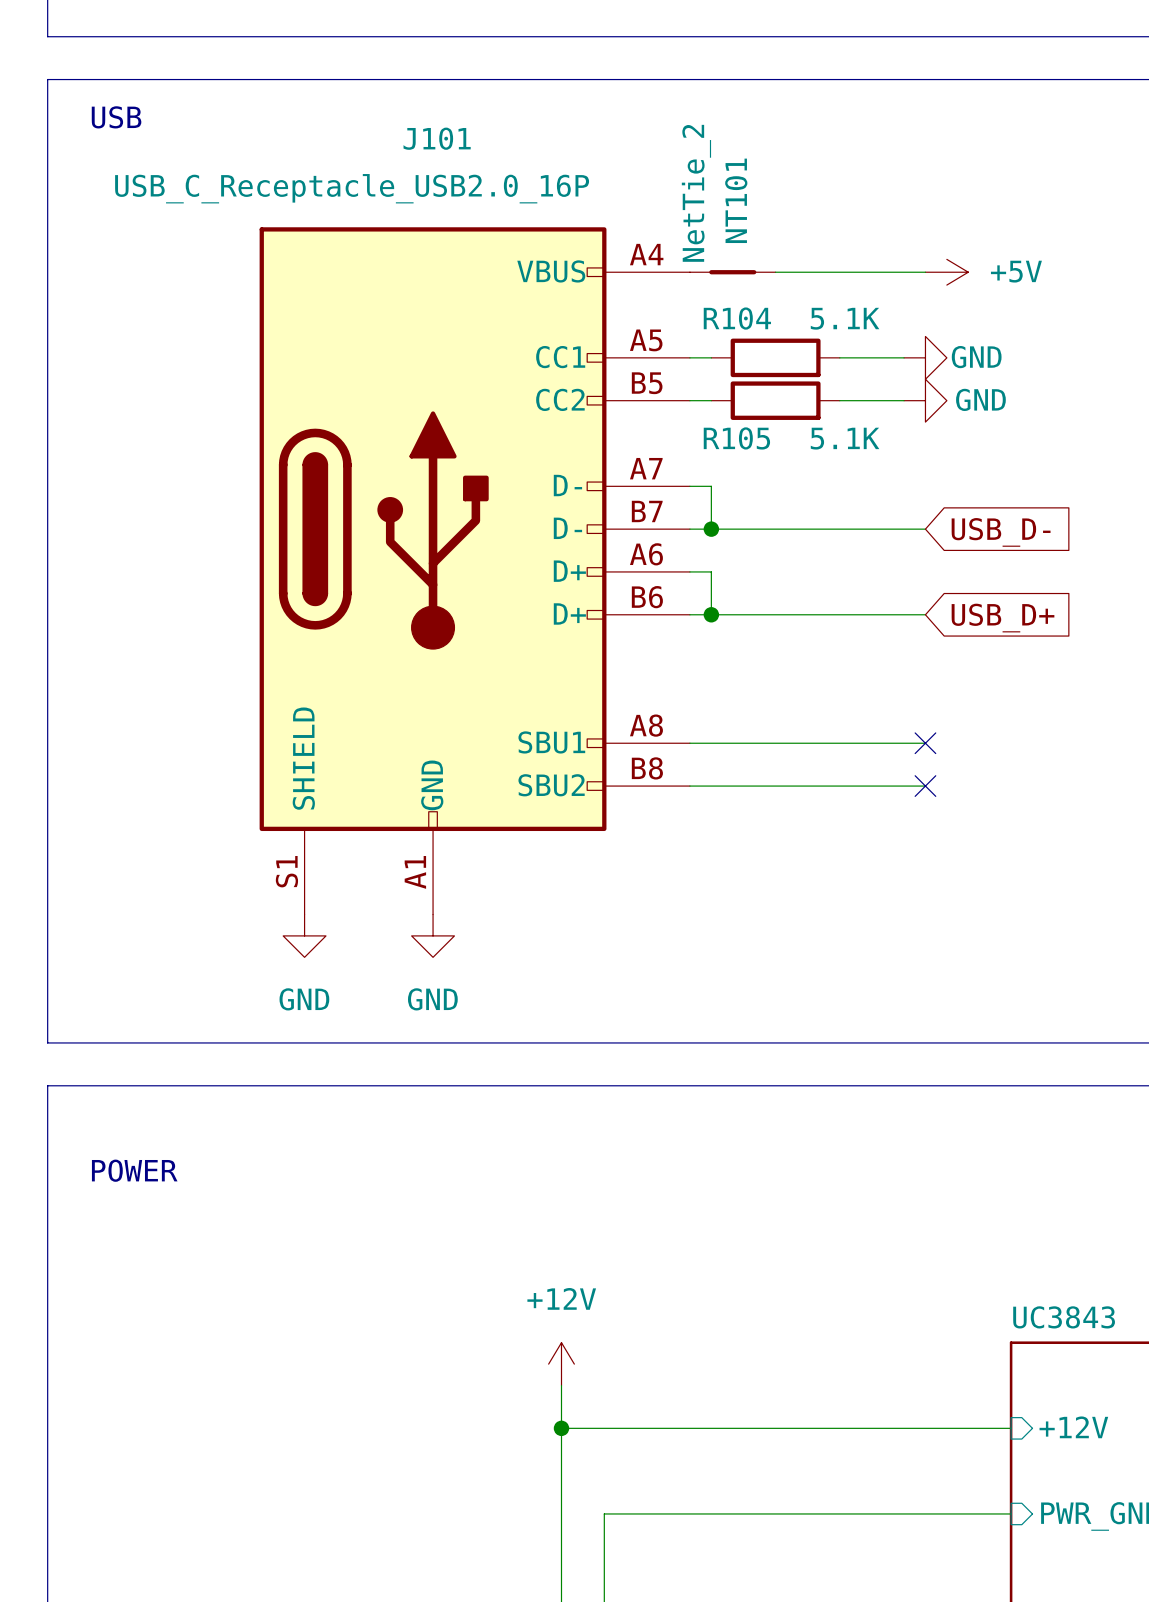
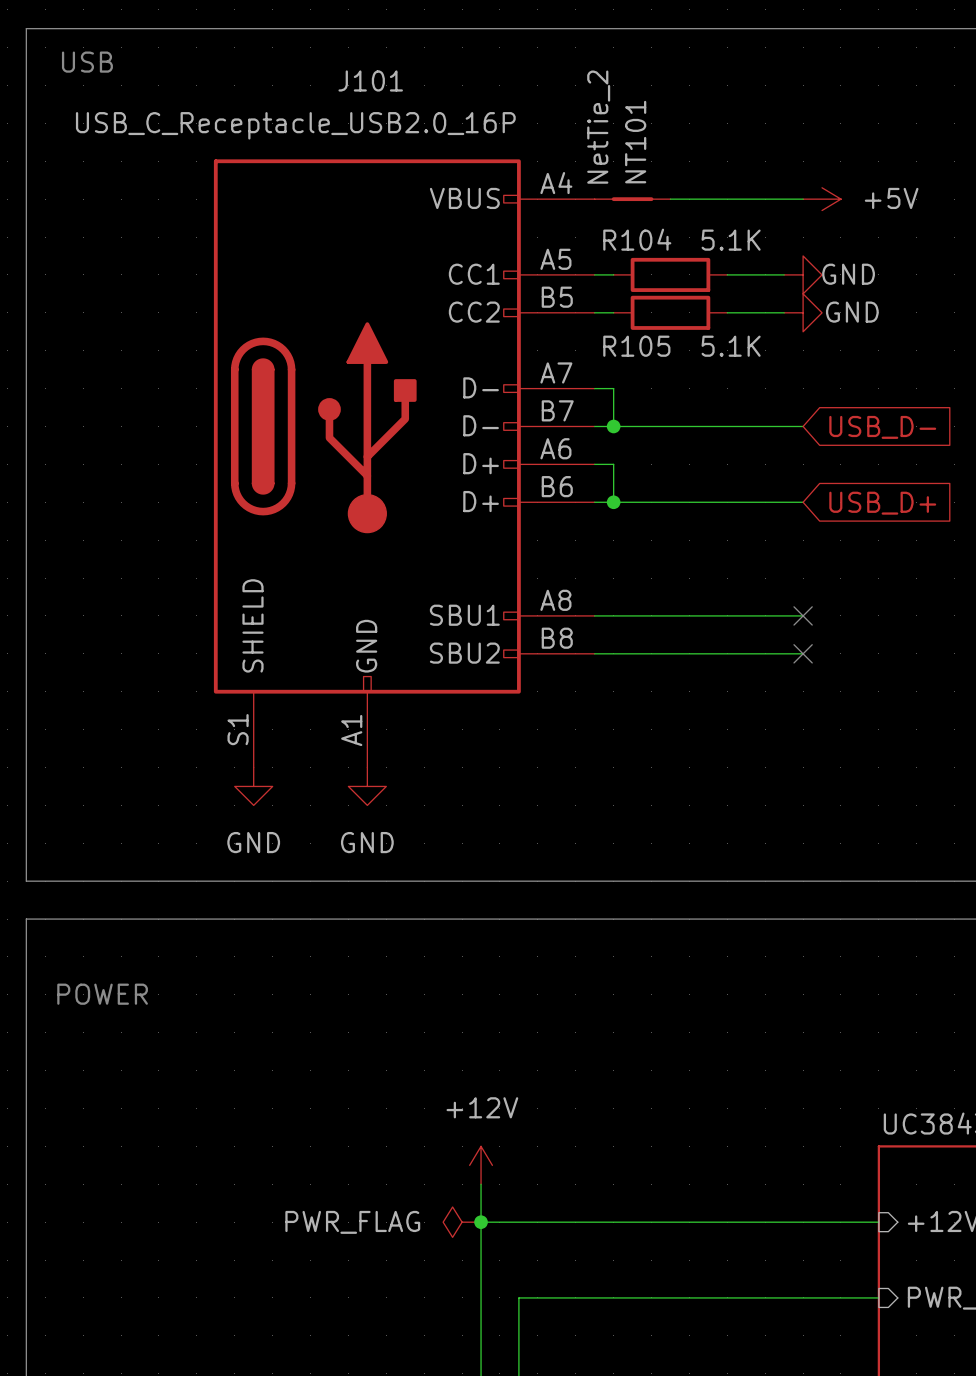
power symbol: none -> PWR_FLAG (462, 1222)

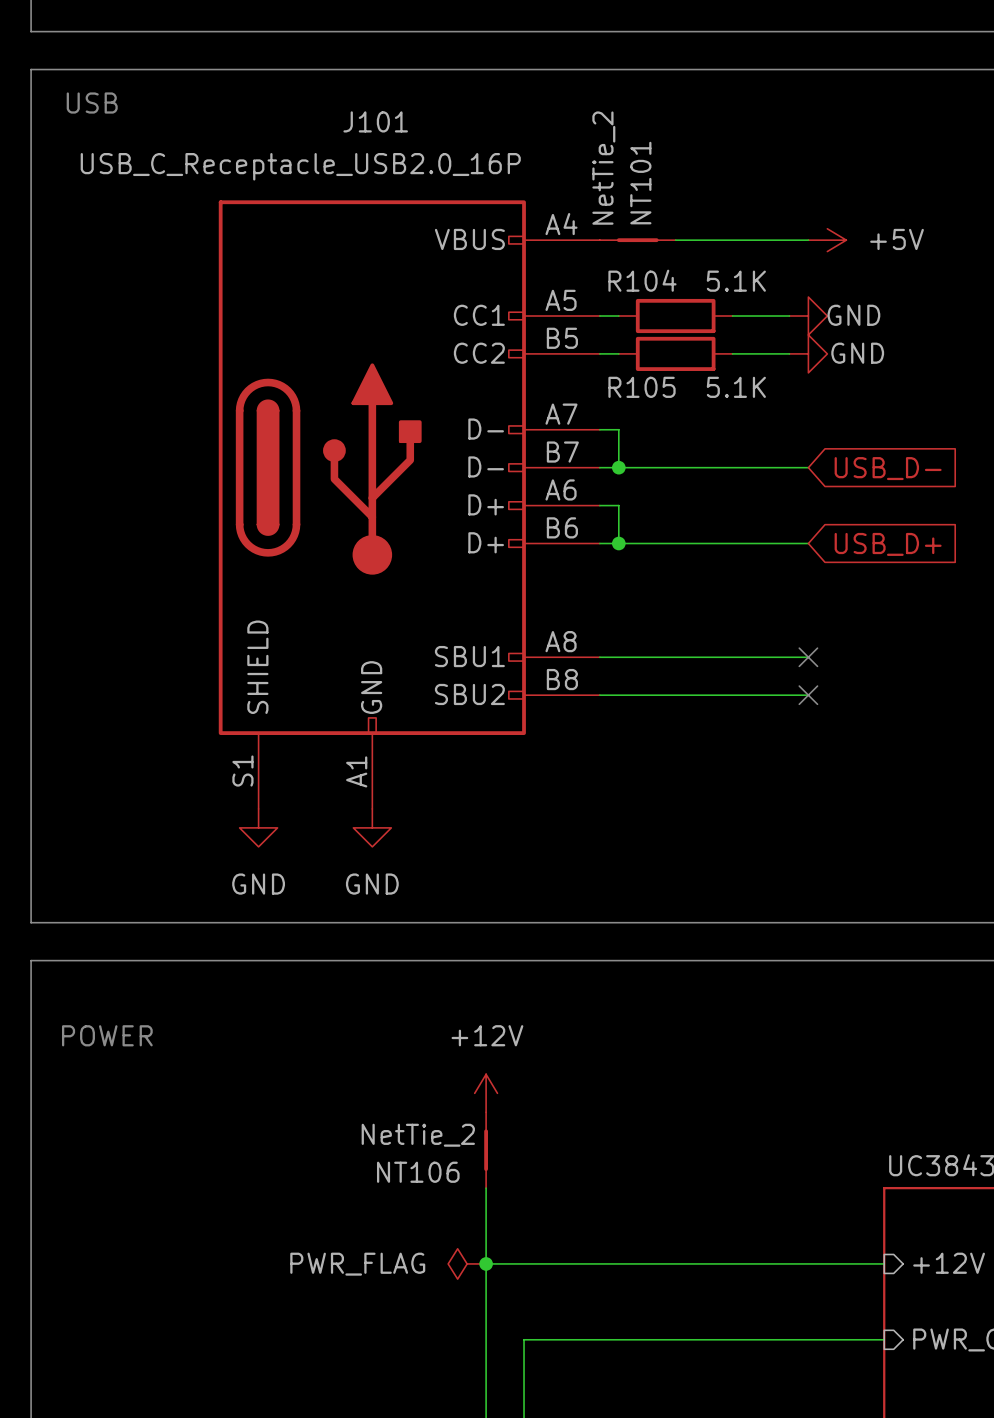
NT106: none -> NetTie_2 (486, 1150)
power symbol position: +12V (481, 1165) -> +12V (486, 1093)

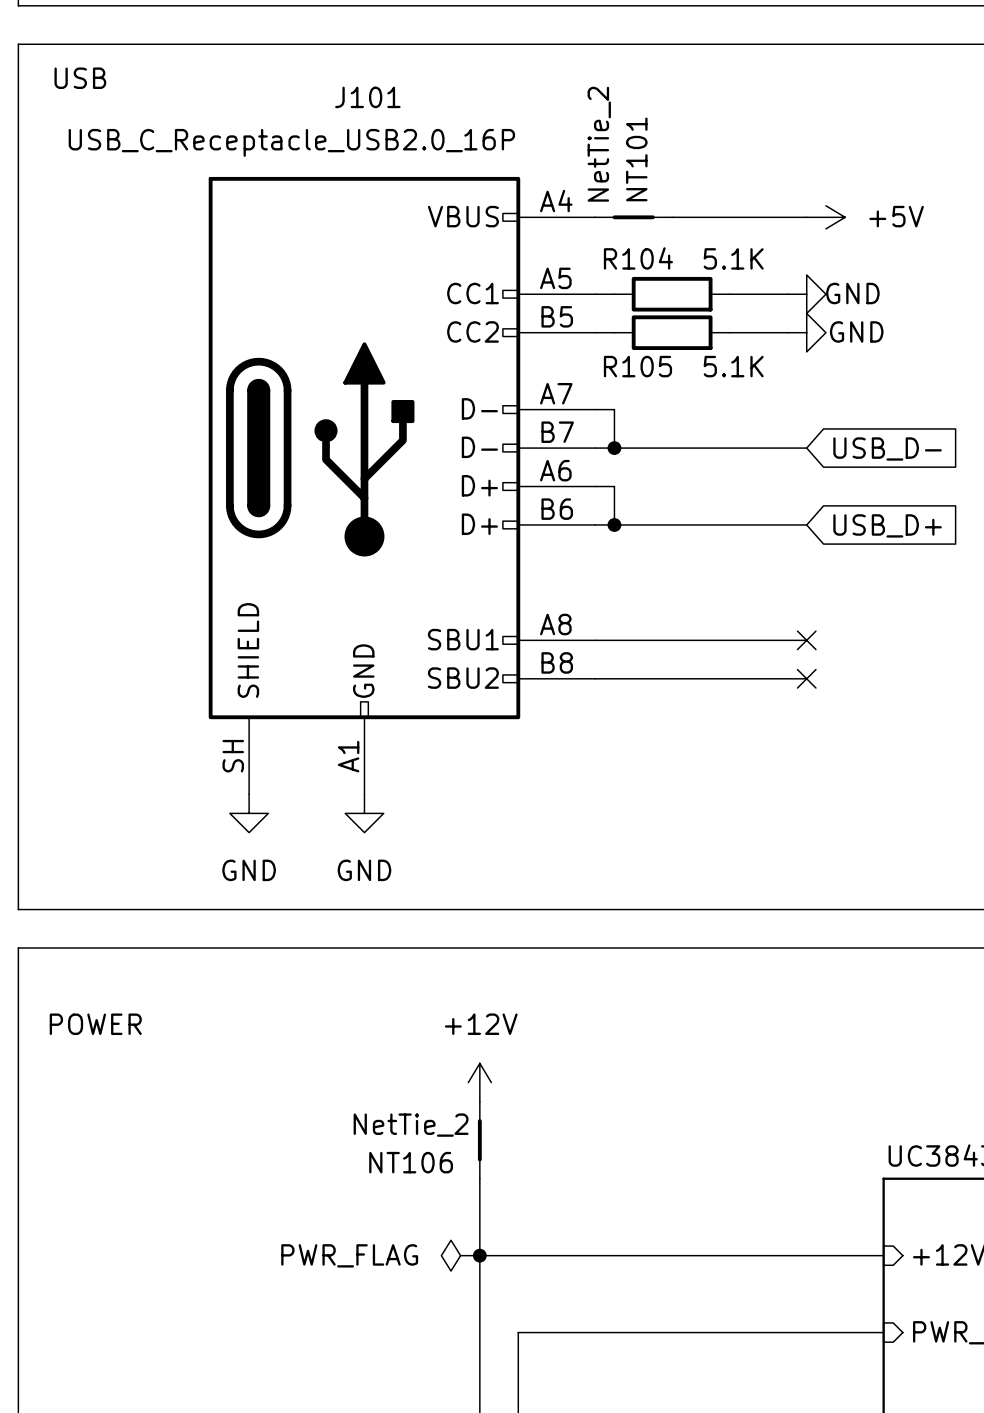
J101 pin number: S1 (242, 771) -> SH (233, 756)

